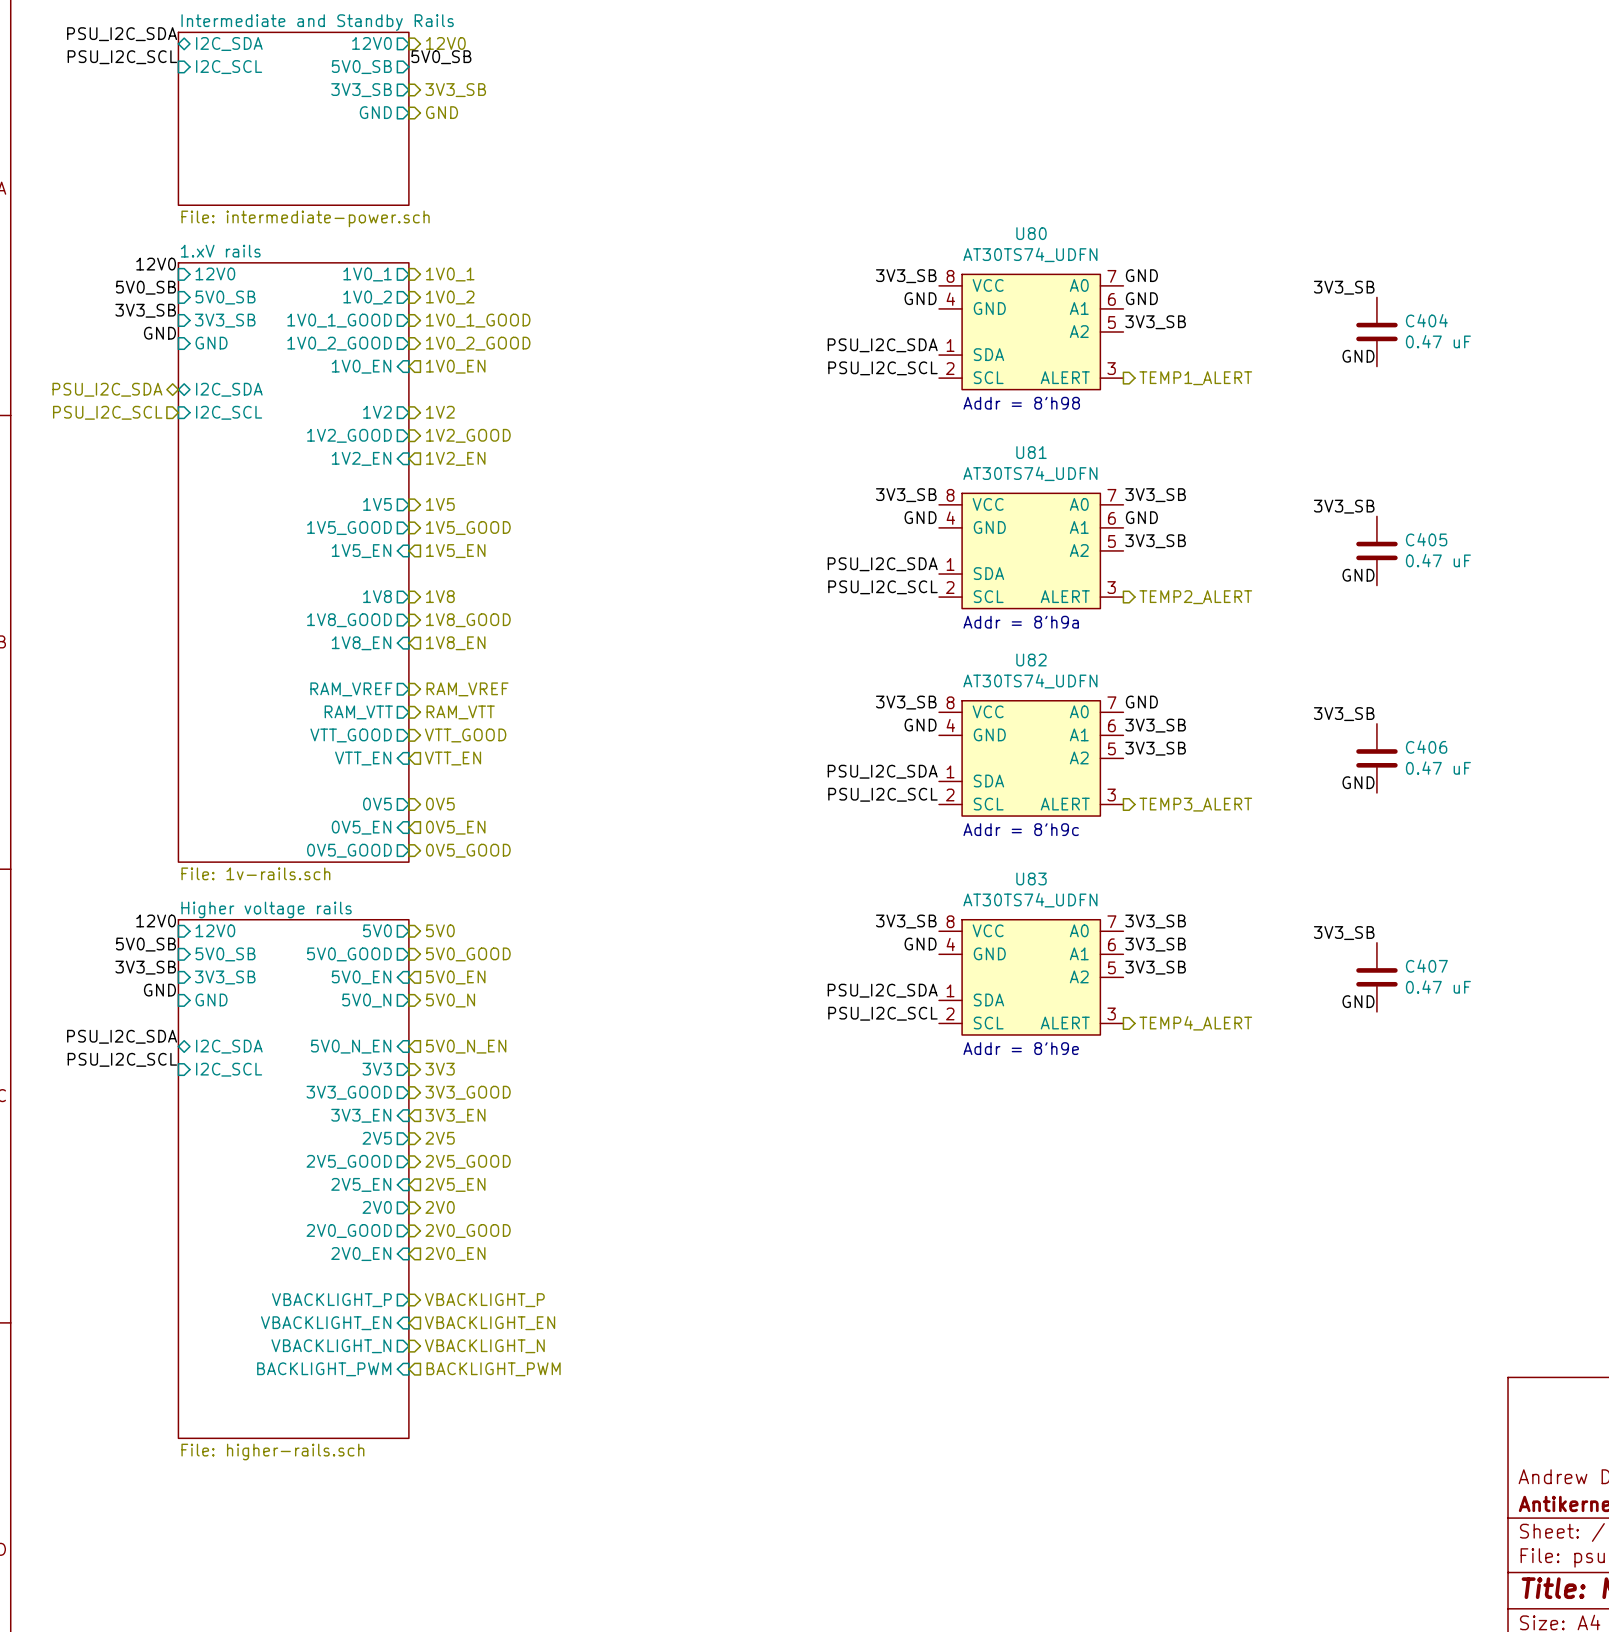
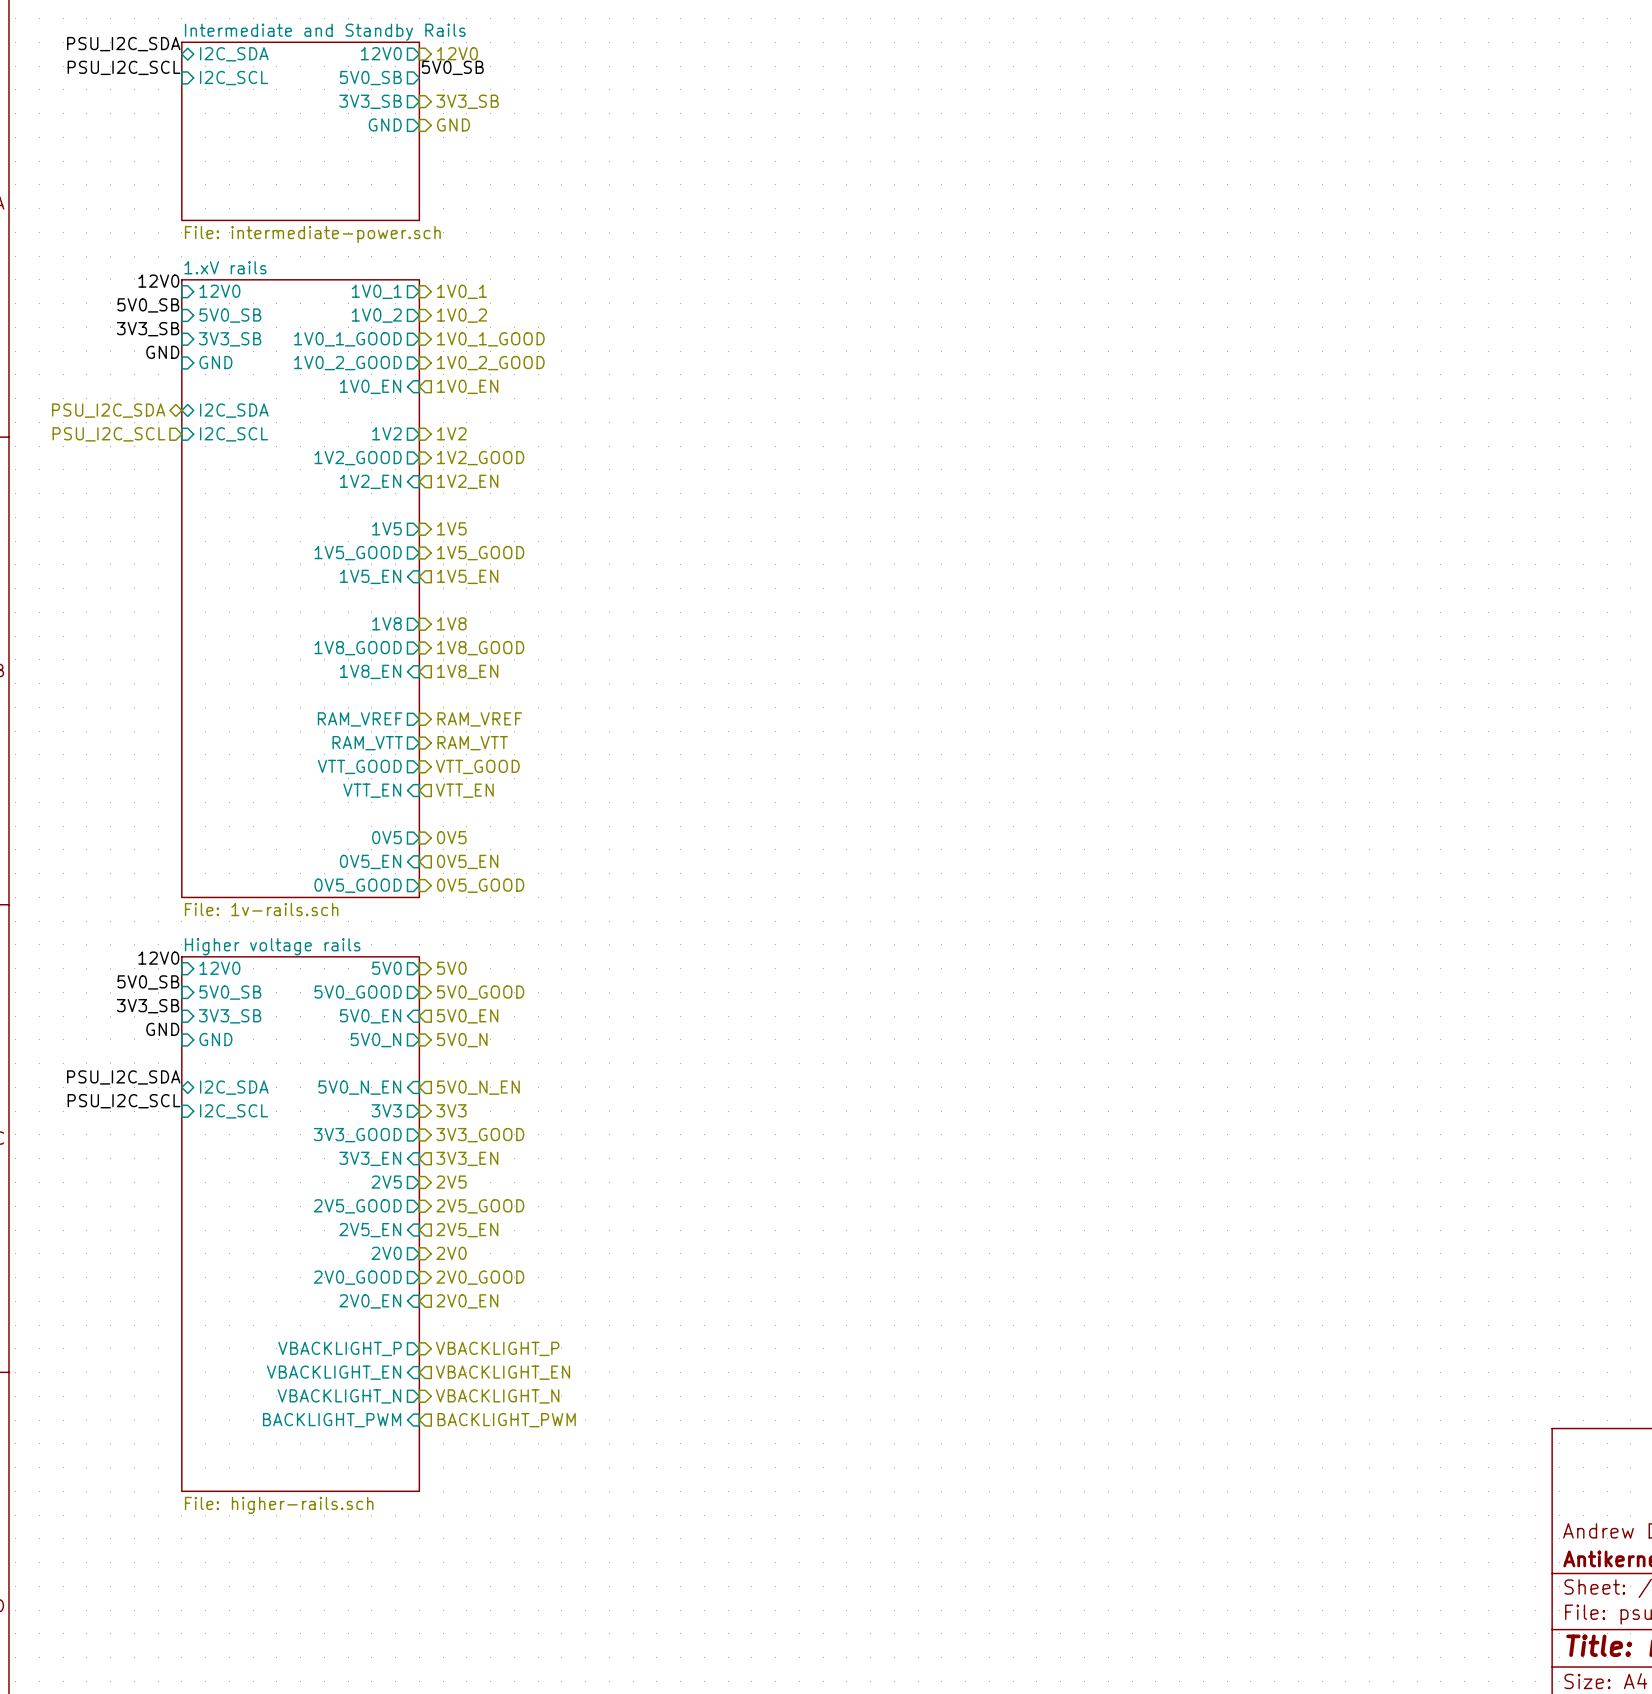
label: GND (1141, 275) -> none
label: 3V3_SB (906, 276) -> none
label: 3V3_SB (1344, 287) -> none
label: GND (920, 298) -> none
label: GND (1141, 298) -> none
label: 3V3_SB (1155, 322) -> none
U80: AT30TS74_UDFN (1031, 332) -> none
C404: 0.47 uF (1376, 332) -> none
label: PSU_I2C_SDA (882, 345) -> none
label: GND (1358, 356) -> none
label: PSU_I2C_SCL (882, 368) -> none
hierarchical label: TEMP1_ALERT (1195, 378) -> none
text: Addr = 8'h98 (1021, 403) -> none
label: 3V3_SB (906, 495) -> none
label: 3V3_SB (1155, 495) -> none
label: 3V3_SB (1344, 506) -> none
label: GND (920, 517) -> none
label: GND (1141, 517) -> none
label: 3V3_SB (1155, 541) -> none
U81: AT30TS74_UDFN (1031, 550) -> none
C405: 0.47 uF (1376, 550) -> none
label: PSU_I2C_SDA (882, 564) -> none
label: GND (1358, 575) -> none
label: PSU_I2C_SCL (882, 587) -> none
hierarchical label: TEMP2_ALERT (1195, 597) -> none
text: Addr = 8'h9a (1021, 622) -> none
label: 3V3_SB (906, 702) -> none
label: GND (1141, 702) -> none
label: 3V3_SB (1344, 714) -> none
label: GND (920, 725) -> none
label: 3V3_SB (1155, 725) -> none
label: 3V3_SB (1155, 748) -> none
U82: AT30TS74_UDFN (1031, 758) -> none
C406: 0.47 uF (1376, 758) -> none
label: PSU_I2C_SDA (882, 771) -> none
label: GND (1358, 782) -> none
label: PSU_I2C_SCL (882, 794) -> none
hierarchical label: TEMP3_ALERT (1195, 804) -> none
text: Addr = 8'h9c (1021, 829) -> none
label: 3V3_SB (906, 921) -> none
label: 3V3_SB (1155, 921) -> none
label: 3V3_SB (1344, 933) -> none
label: GND (920, 944) -> none
label: 3V3_SB (1155, 944) -> none
label: 3V3_SB (1155, 967) -> none
U83: AT30TS74_UDFN (1031, 977) -> none
C407: 0.47 uF (1376, 977) -> none
label: PSU_I2C_SDA (882, 990) -> none
label: GND (1358, 1001) -> none
label: PSU_I2C_SCL (882, 1013) -> none
hierarchical label: TEMP4_ALERT (1195, 1023) -> none
text: Addr = 8'h9e (1021, 1048) -> none

